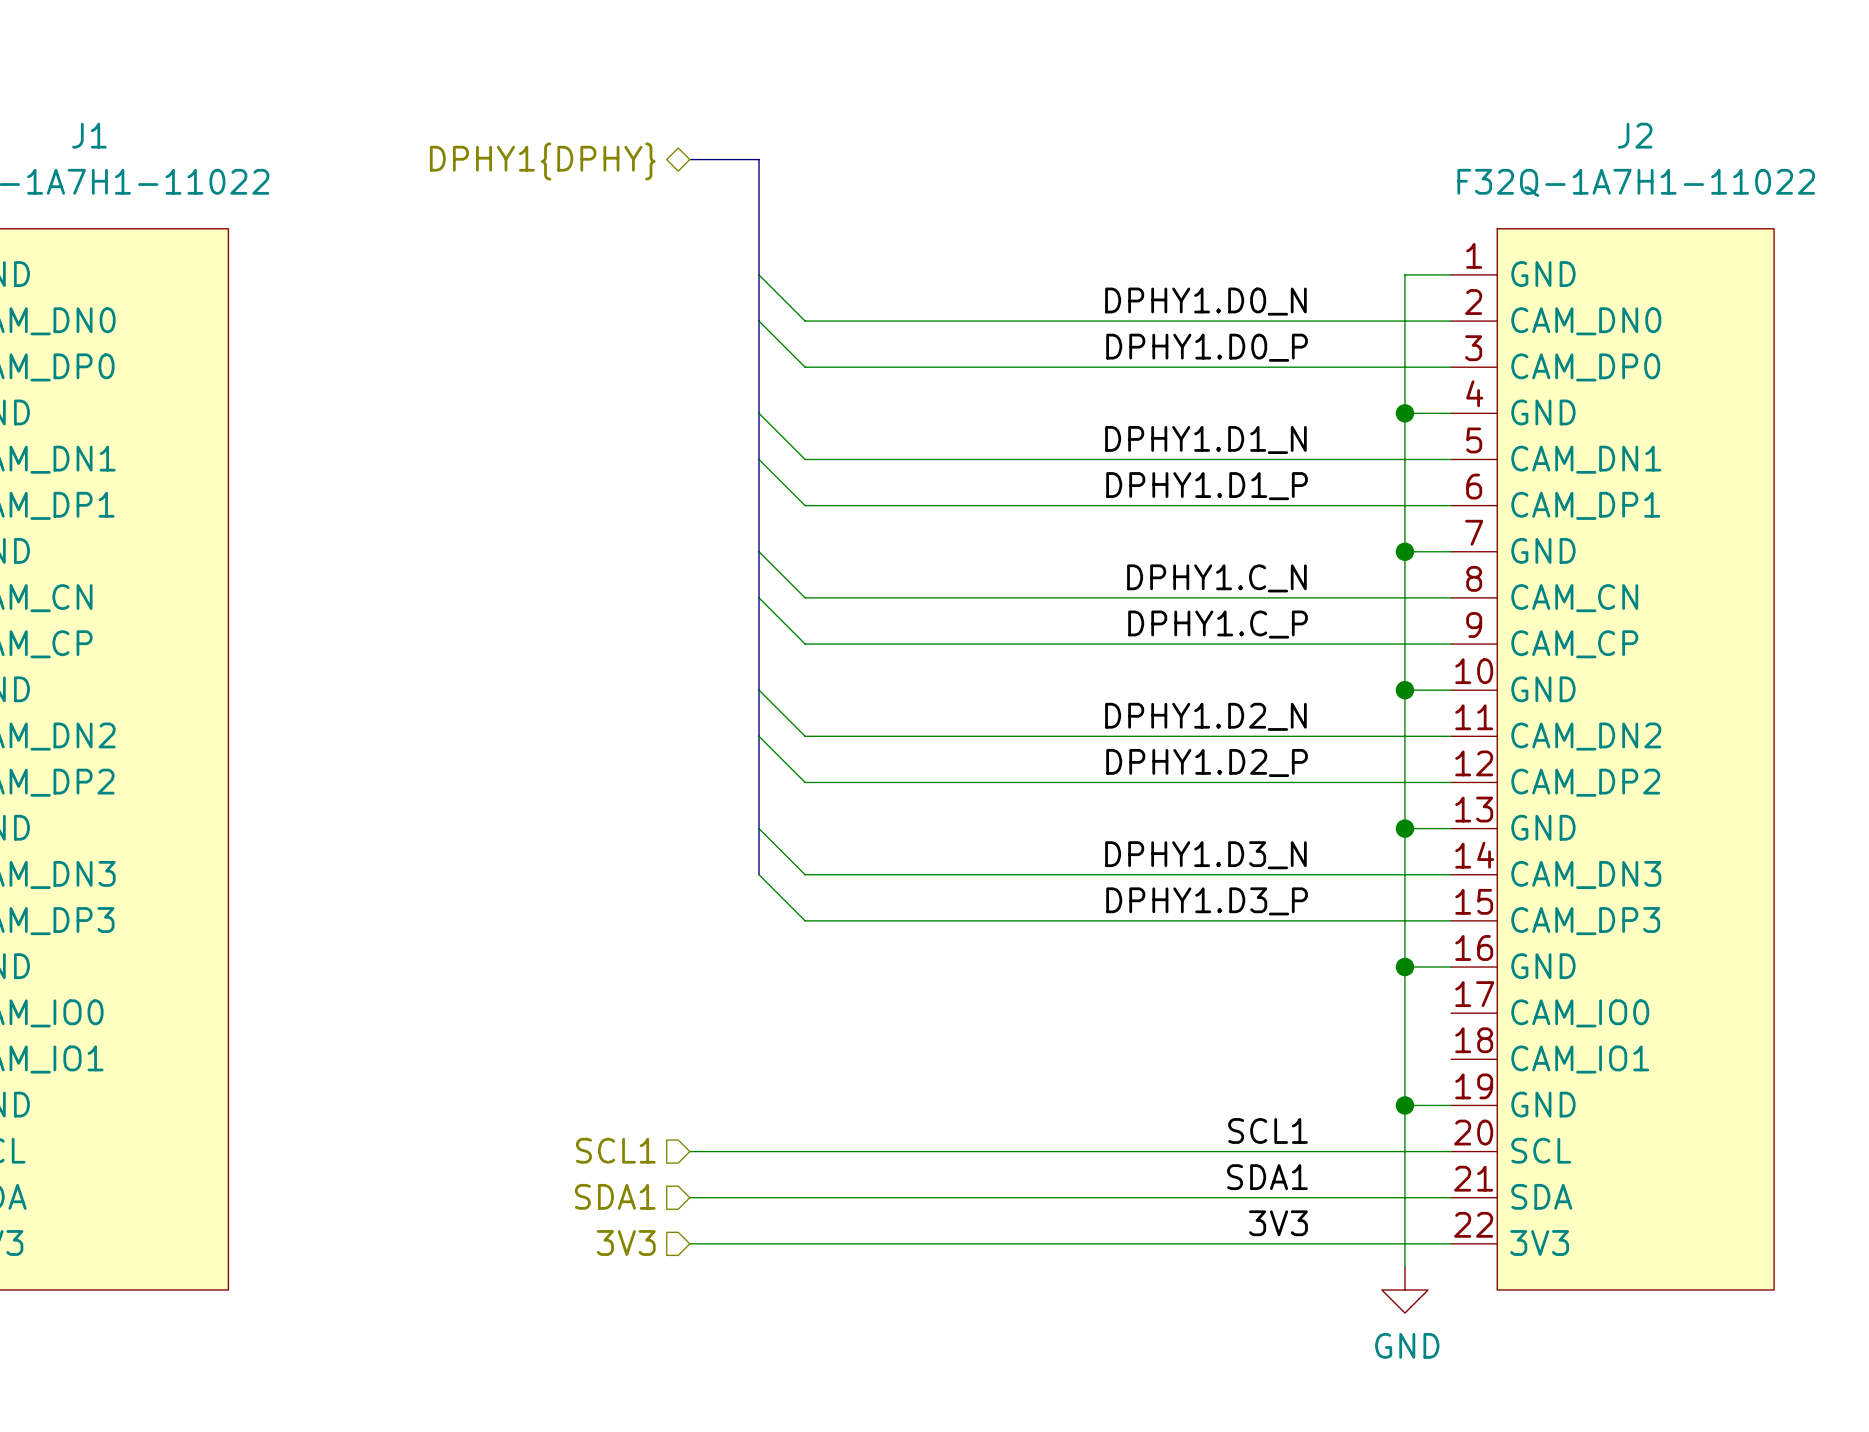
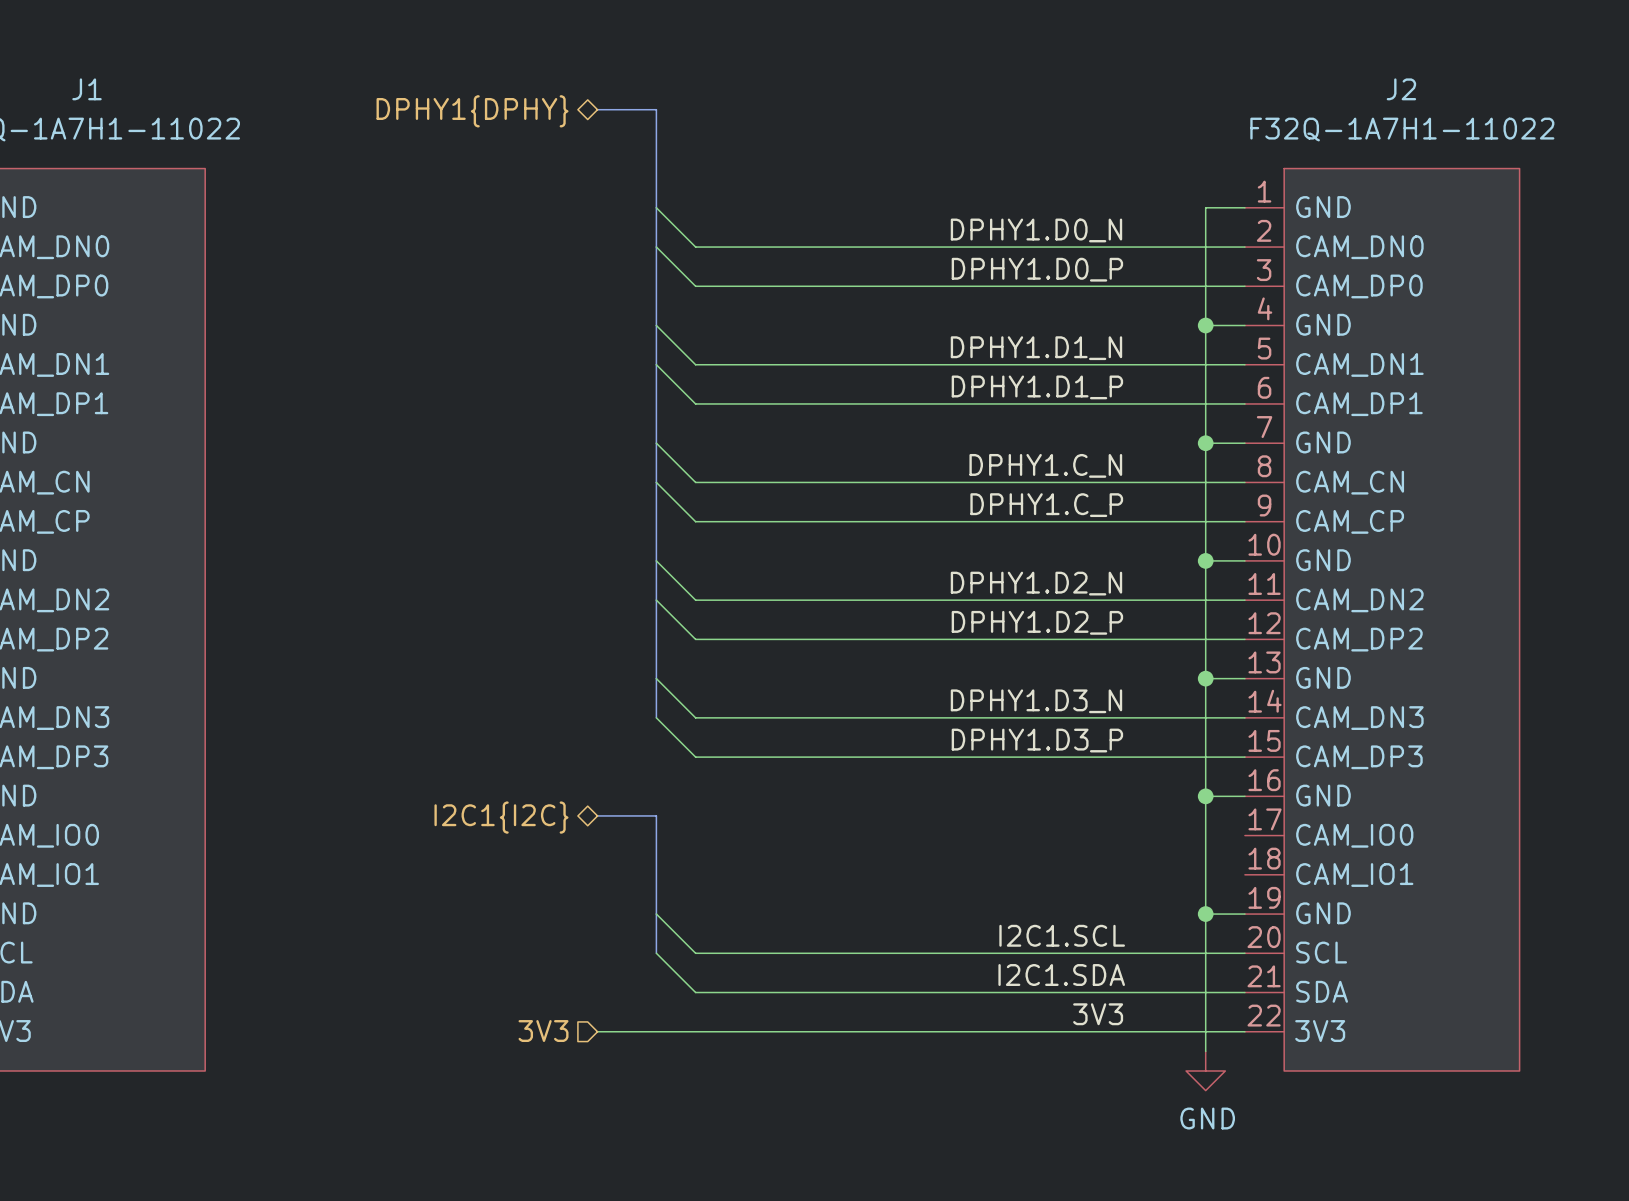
bus: none -> (597, 815) (656, 815) (656, 953)
hierarchical label: none -> I2C1{I2C} (501, 817)
label: SCL1 (1268, 1130) -> I2C1.SCL (1062, 935)
hierarchical label: SCL1 (615, 1150) -> none
wire: (689, 1151) (805, 1151) -> (656, 914) (695, 953)
label: SDA1 (1267, 1177) -> I2C1.SDA (1061, 975)
hierarchical label: SDA1 (615, 1196) -> none
wire: (689, 1197) (805, 1197) -> (656, 953) (695, 992)

